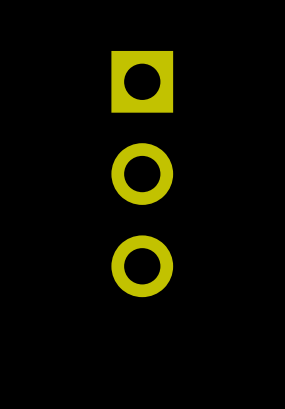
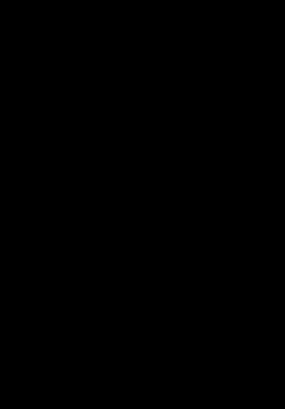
part: (142, 174) -> none

